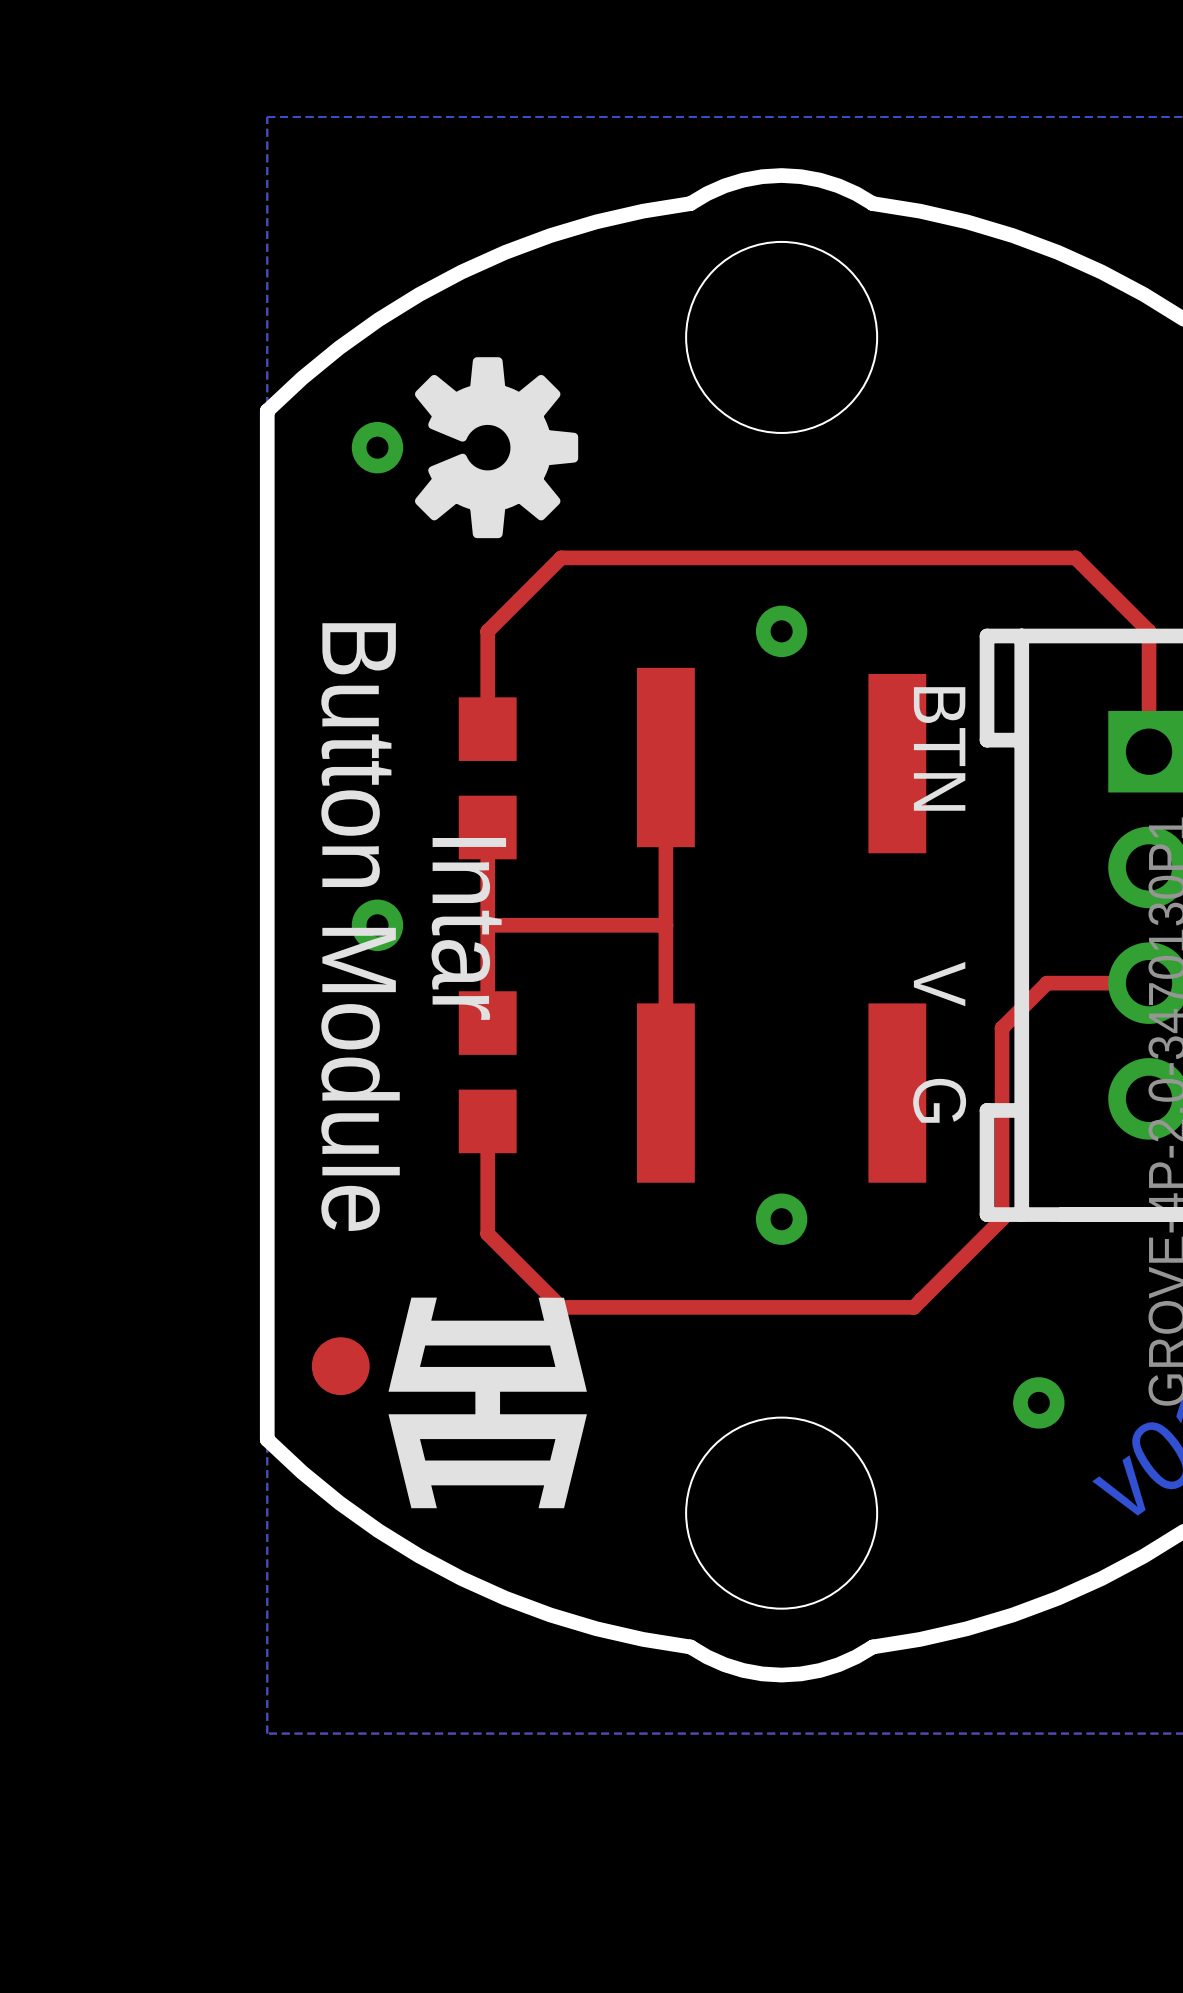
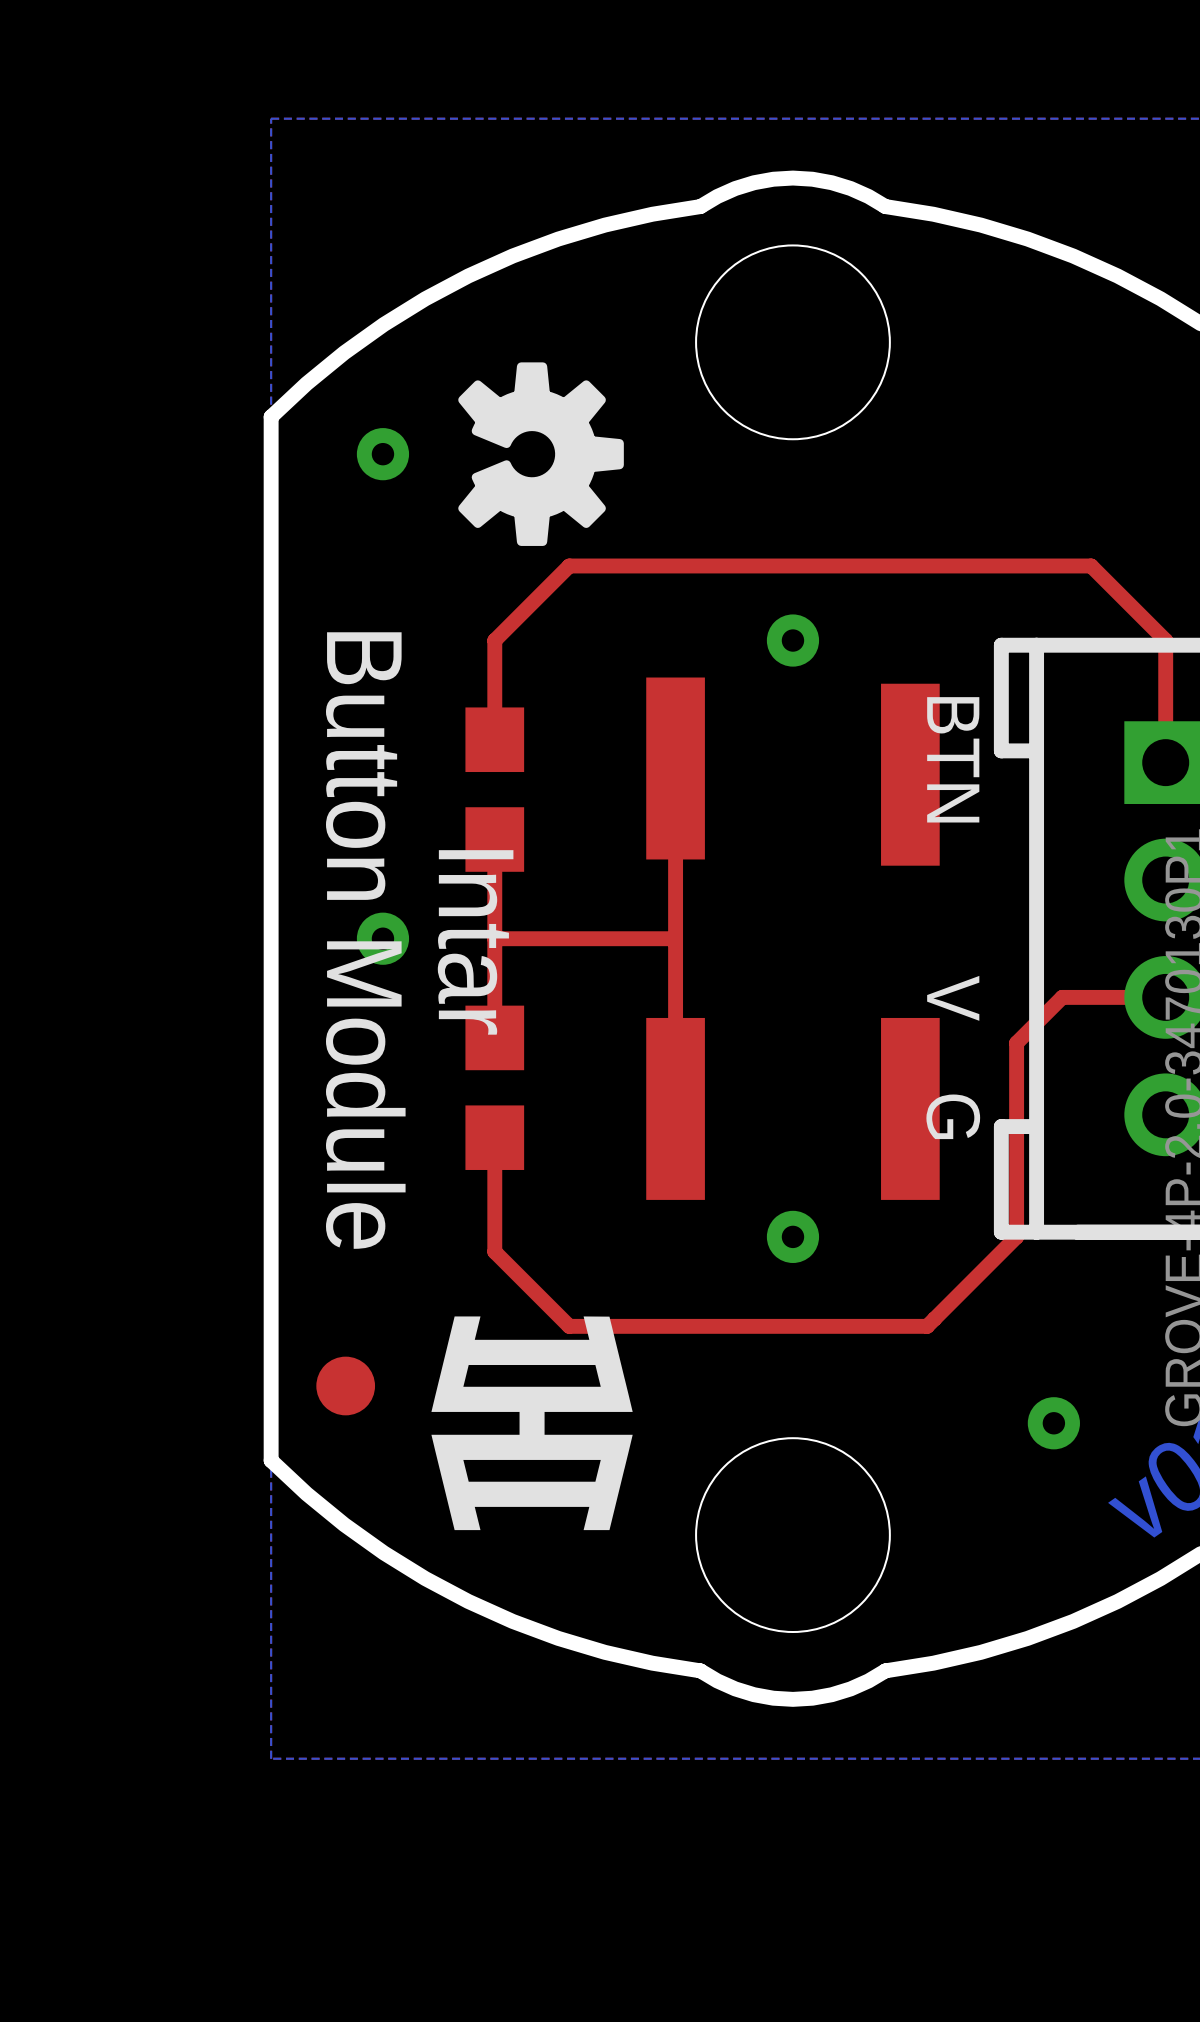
drawing position: (496, 447) -> (541, 454)
drawing position: (487, 1402) -> (532, 1423)

